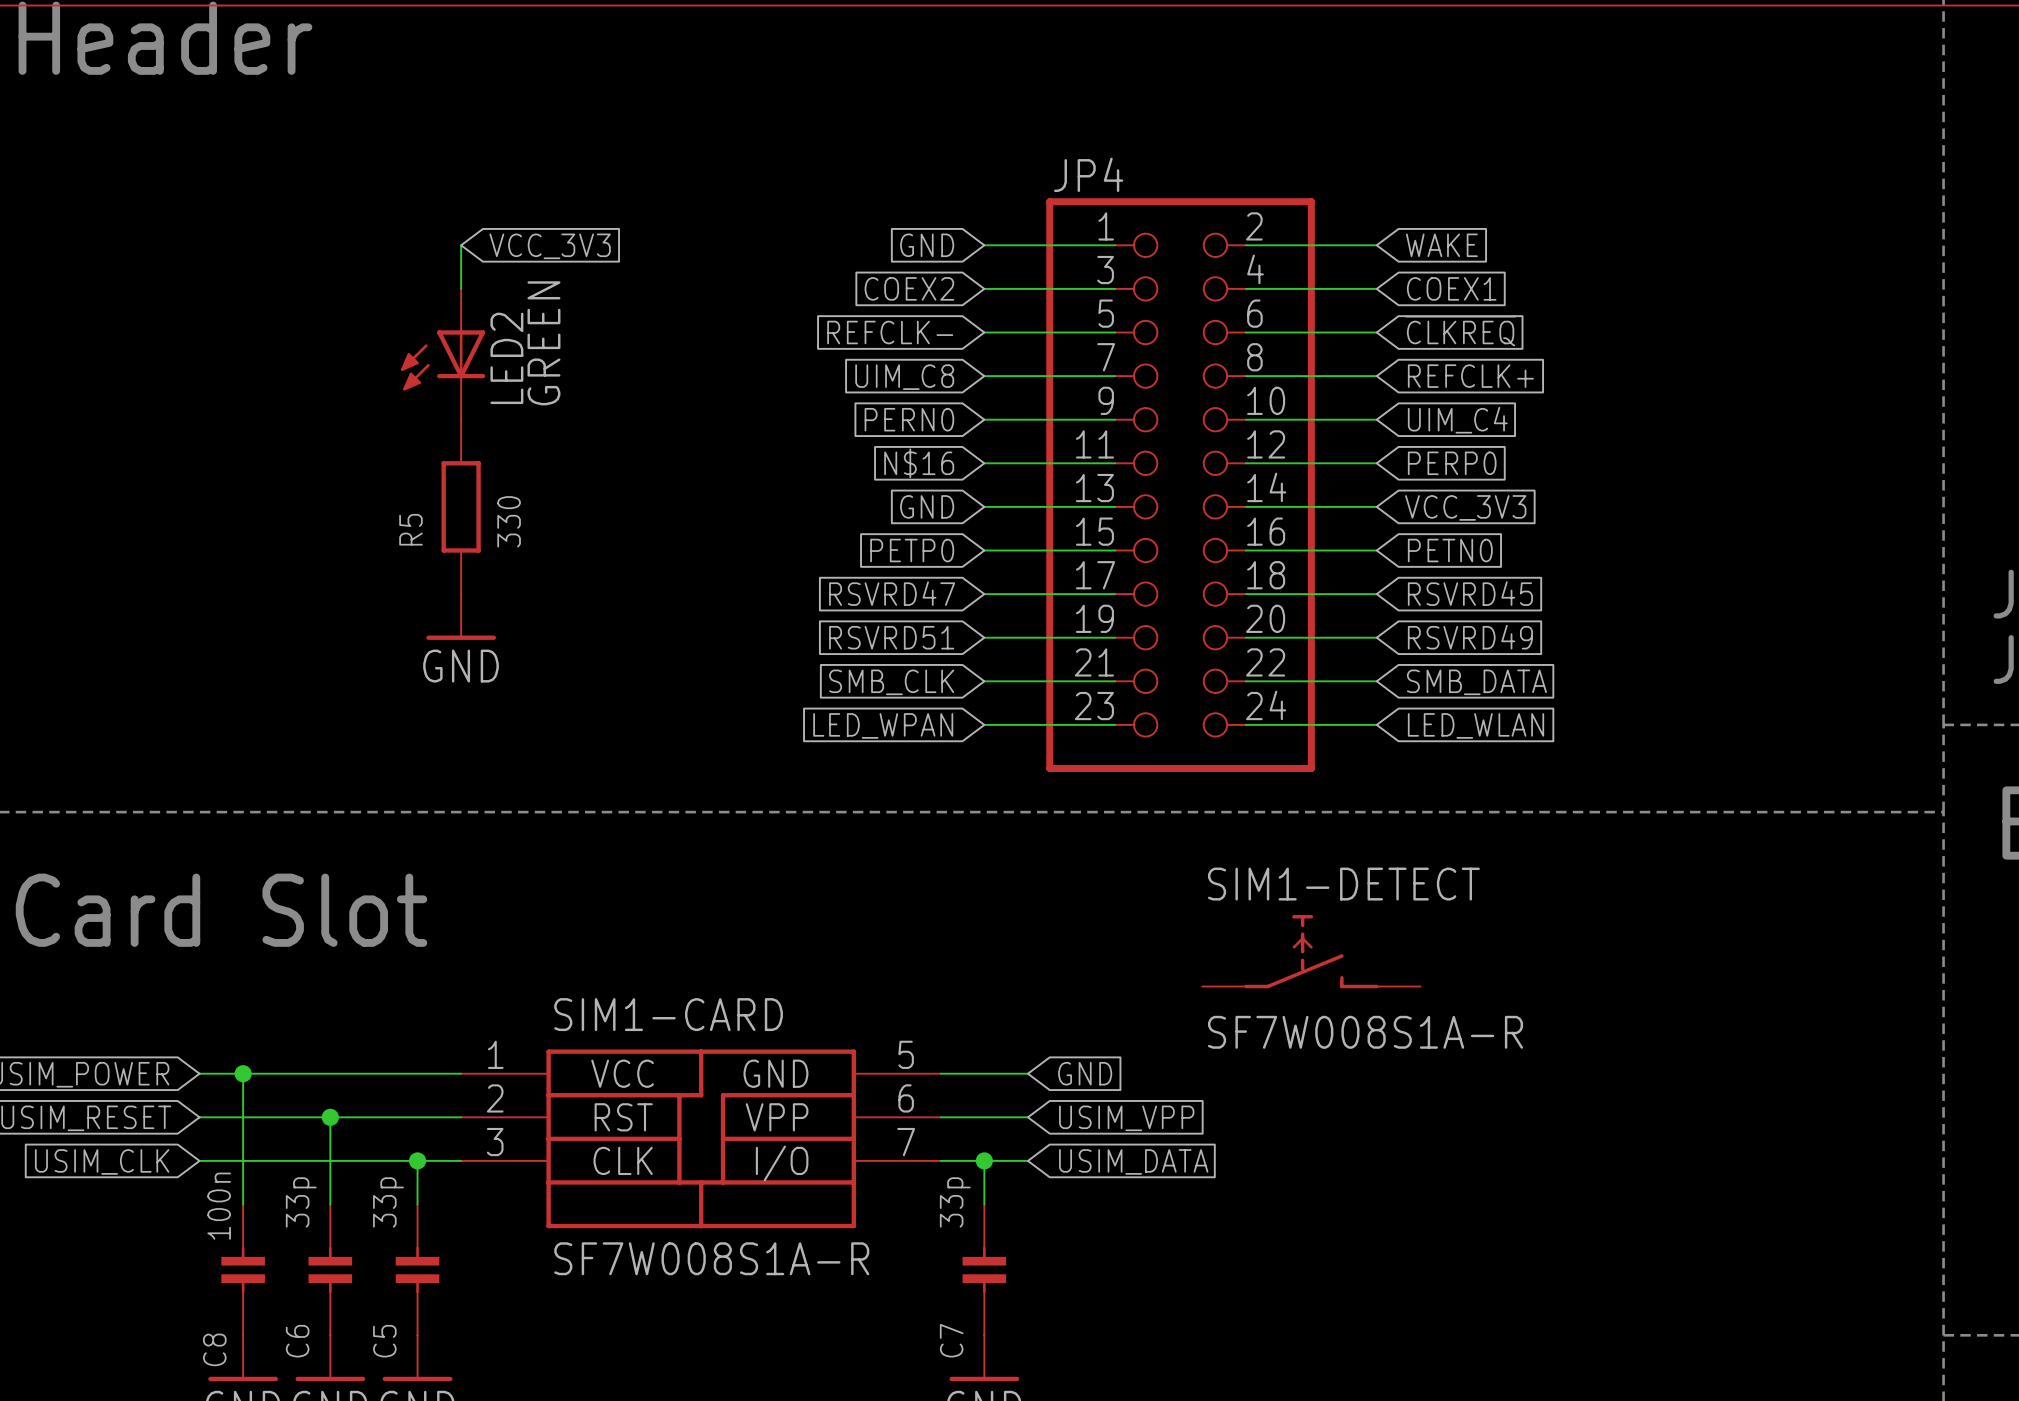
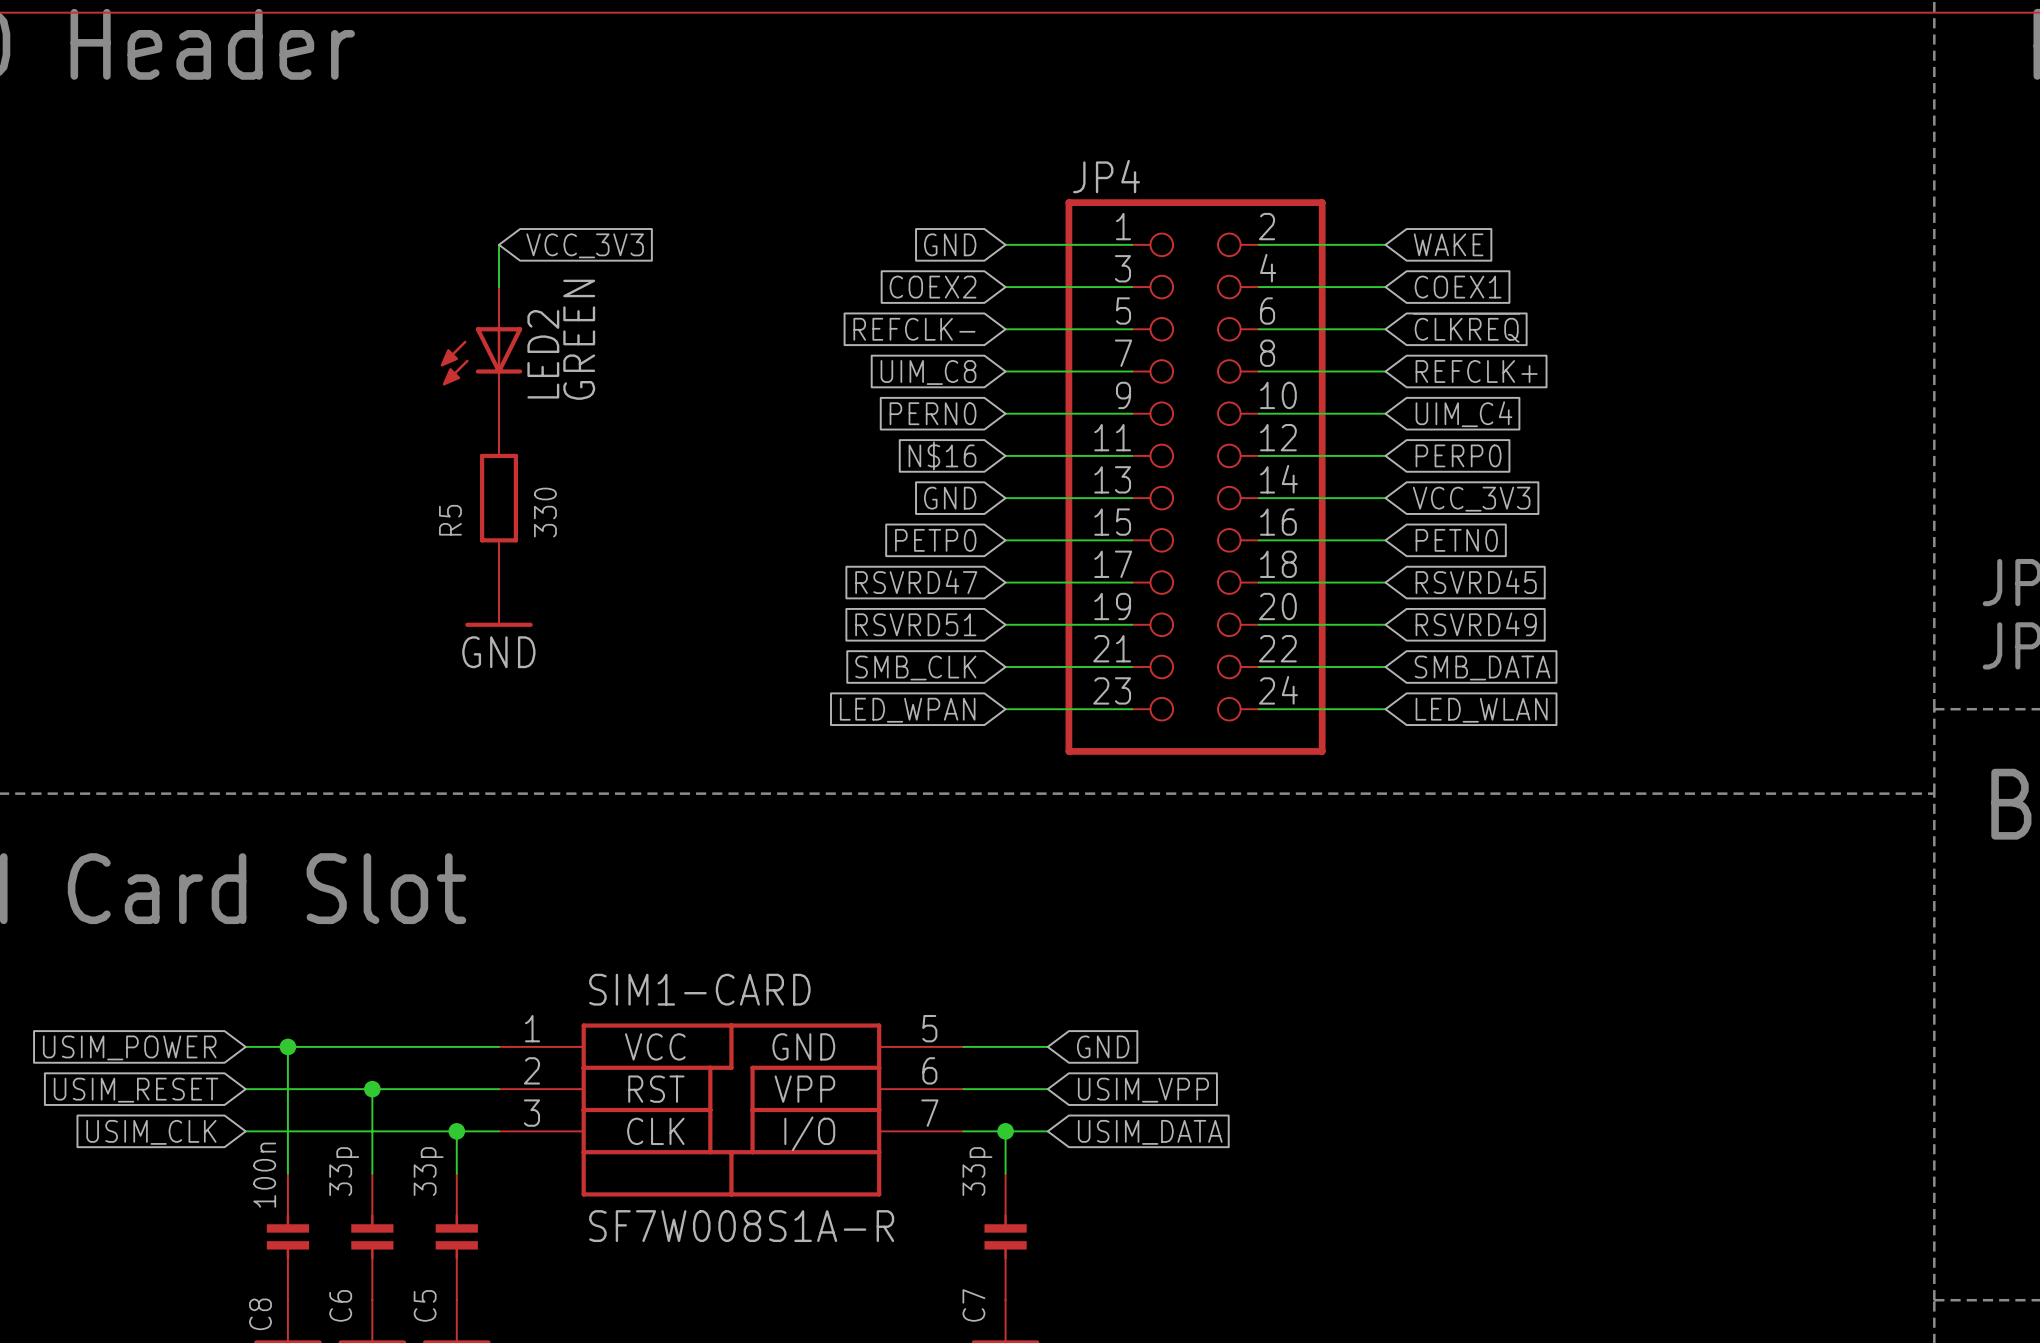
SIM1-DETECT: SF7W008S1A-R (1311, 951) -> none

